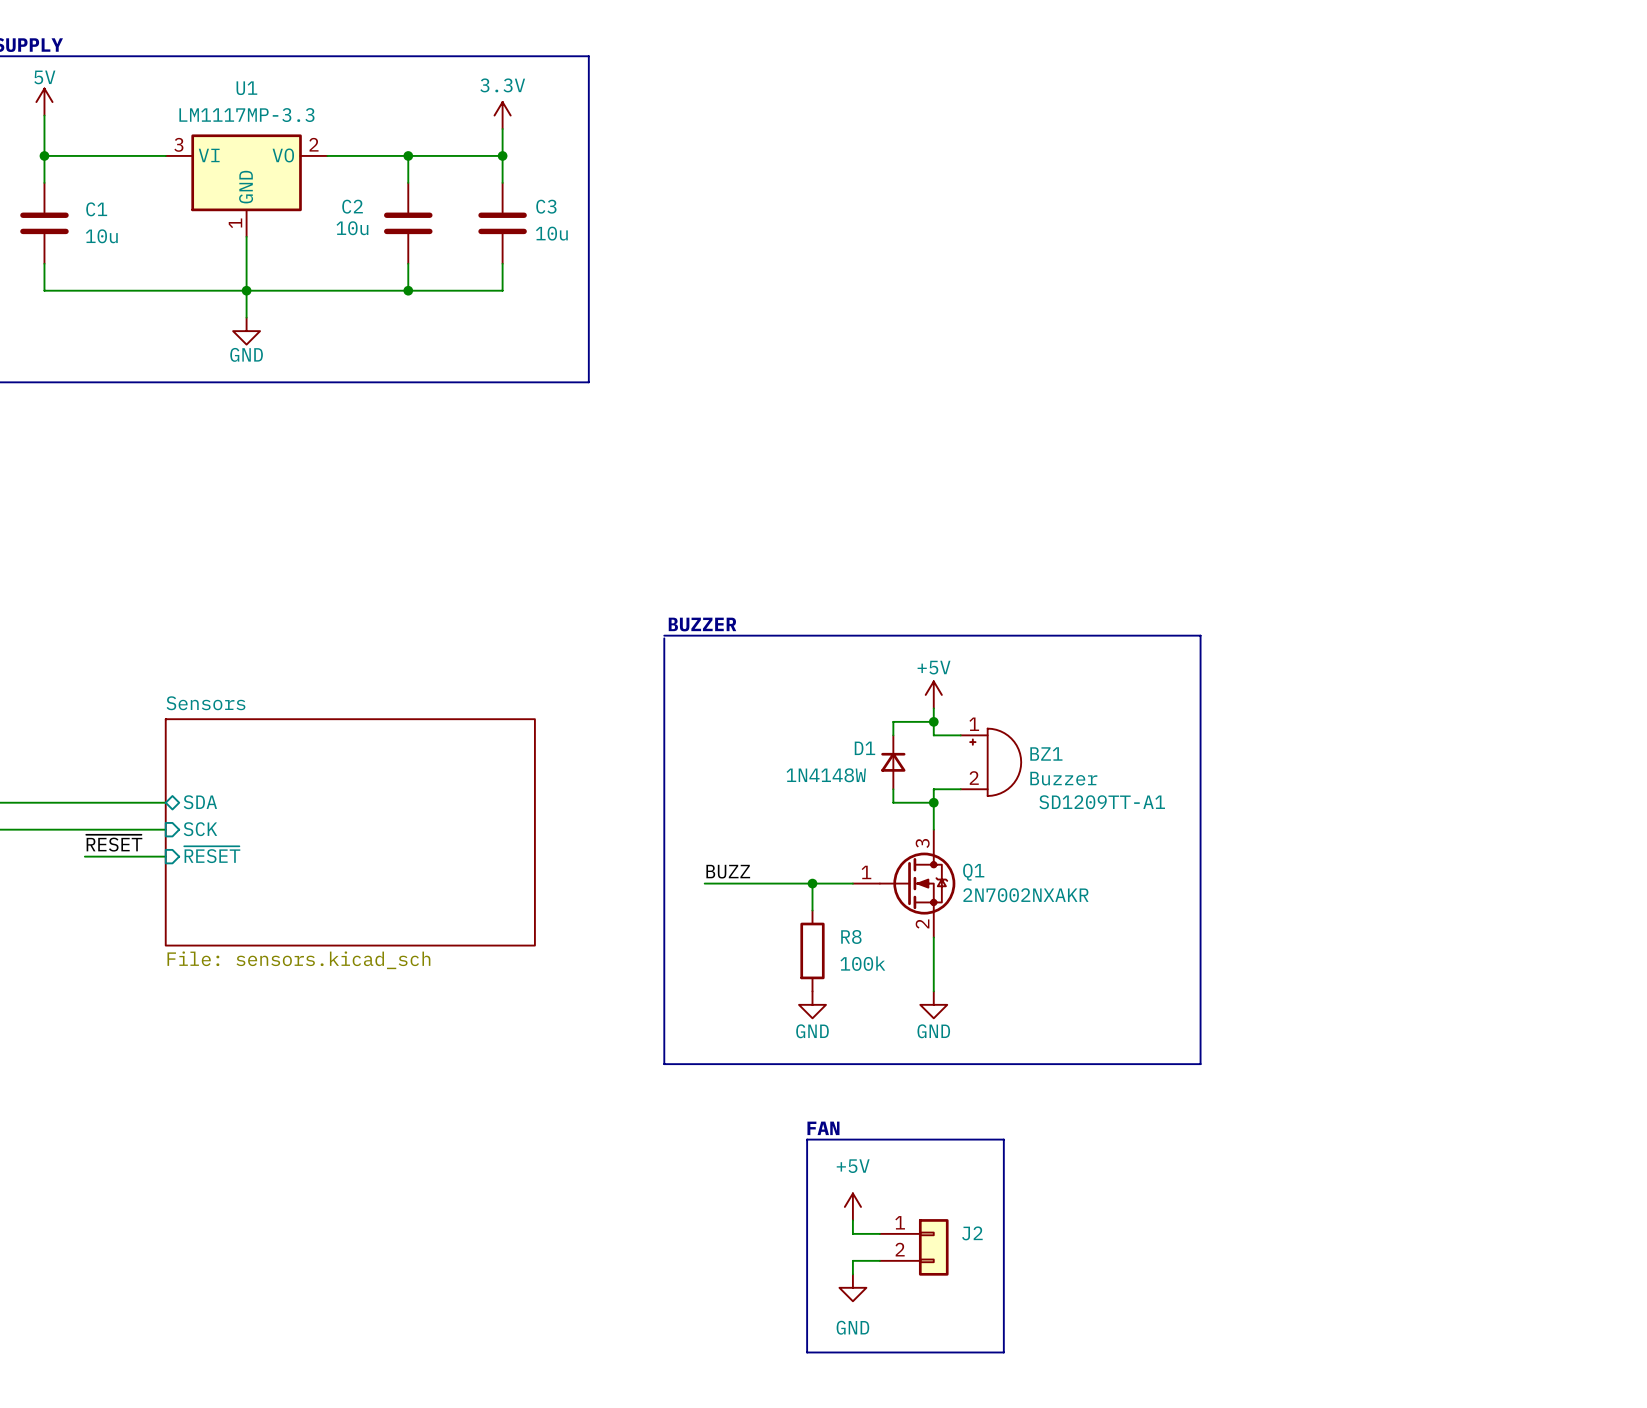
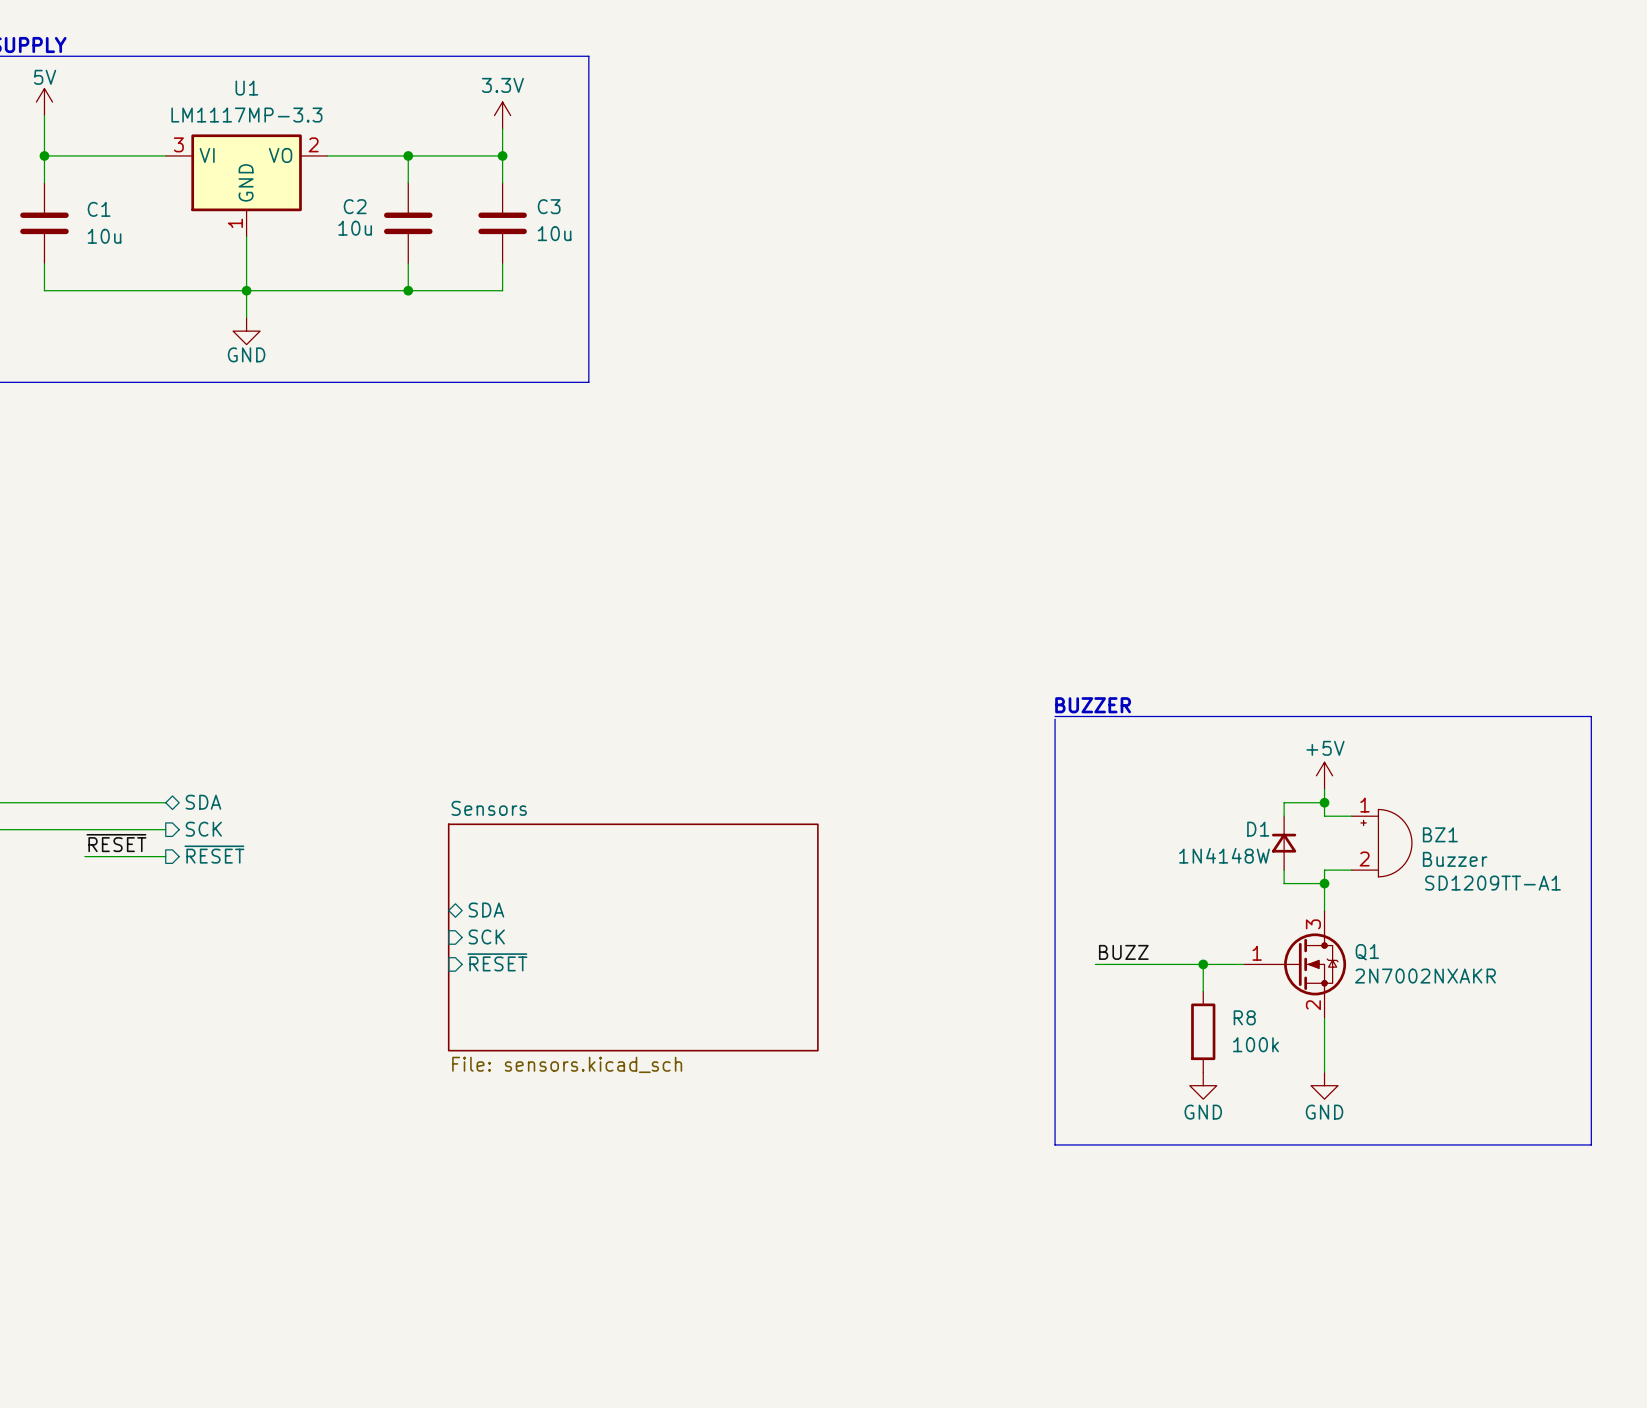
text: BUZZER (702, 624) -> none
line: (664, 635) (1200, 635) (1200, 1064) (664, 1064) (664, 638) -> none
power symbol: +5V (933, 694) -> none
text: none -> BUZZER (1093, 705)
wire: (933, 708) (933, 735) (960, 735) -> none
line: none -> (1055, 716) (1591, 716) (1591, 1144) (1055, 1144) (1055, 719)
wire: (933, 721) (893, 721) (893, 735) -> none
junction: (933, 721) -> none
D1 position: (893, 762) -> (1284, 843)
BZ1 position: (990, 762) -> (1381, 843)
power symbol: none -> +5V (1324, 775)
wire: (893, 789) (893, 802) (933, 802) -> none
wire: (960, 789) (933, 789) (933, 829) -> none
wire: none -> (1324, 789) (1324, 816) (1351, 816)
junction: (933, 802) -> none
wire: none -> (1324, 802) (1284, 802) (1284, 816)
junction: none -> (1324, 802)
sheet Sensors: File: sensors.kicad_sch (350, 832) -> none
wire: none -> (1284, 870) (1284, 883) (1324, 883)
wire: none -> (1351, 870) (1324, 870) (1324, 910)
label: BUZZ (728, 871) -> none
wire: (704, 883) (852, 883) -> none
wire: (812, 883) (812, 910) -> none
junction: (812, 883) -> none
Q1 position: (904, 883) -> (1294, 964)
junction: none -> (1324, 883)
sheet pin: none -> SDA (486, 910)
sheet pin: none -> SCK (486, 936)
sheet Sensors: none -> File: sensors.kicad_sch (633, 937)
wire: (933, 937) (933, 991) -> none
R8 position: (812, 950) -> (1203, 1031)
label: none -> BUZZ (1123, 952)
sheet pin: none -> ~{RESET} (497, 962)
wire: none -> (1095, 964) (1243, 964)
wire: none -> (1203, 964) (1203, 991)
junction: none -> (1203, 964)
power symbol: GND (812, 1004) -> none
power symbol: GND (933, 1004) -> none
wire: none -> (1324, 1018) (1324, 1072)
power symbol: none -> GND (1203, 1085)
power symbol: none -> GND (1324, 1085)
text: FAN (823, 1128) -> none
line: (807, 1139) (807, 1352) (1003, 1352) (1003, 1139) (807, 1139) -> none
power symbol: +5V (852, 1206) -> none
wire: (852, 1220) (852, 1233) (879, 1233) -> none
J2: (914, 1247) -> none
wire: (879, 1260) (852, 1260) (852, 1274) -> none
power symbol: GND (852, 1287) -> none

